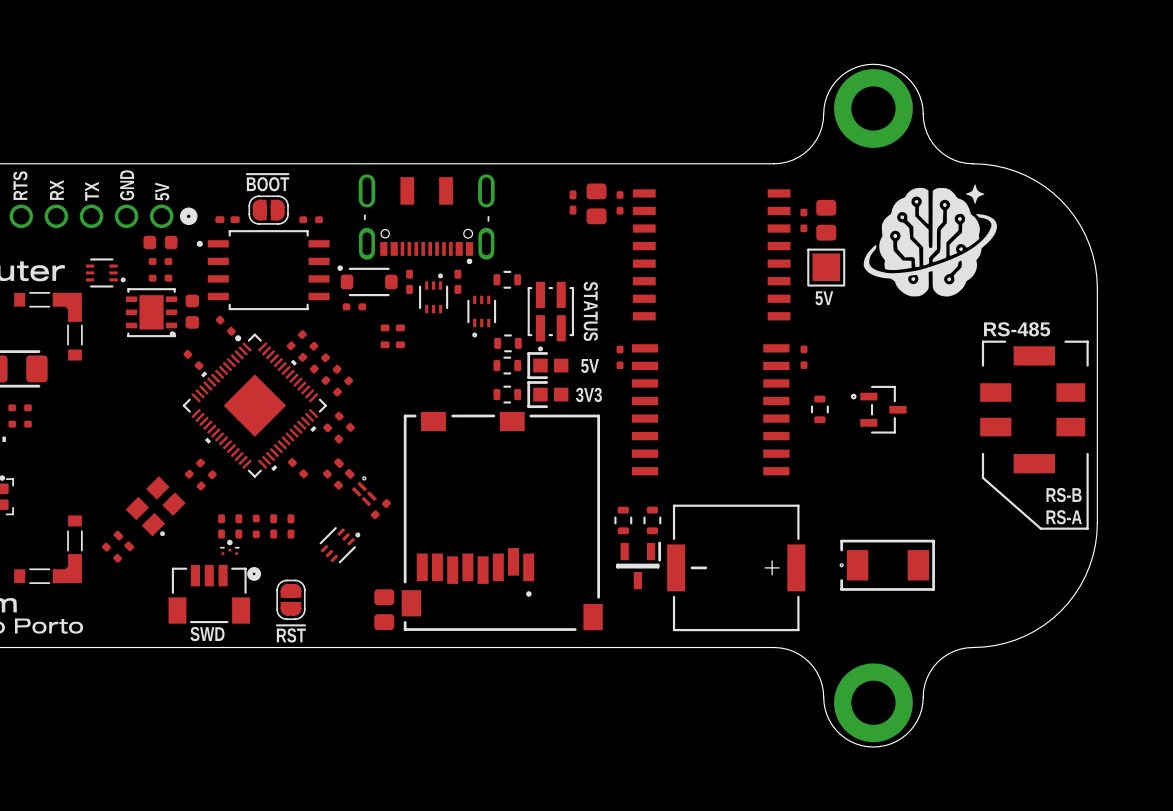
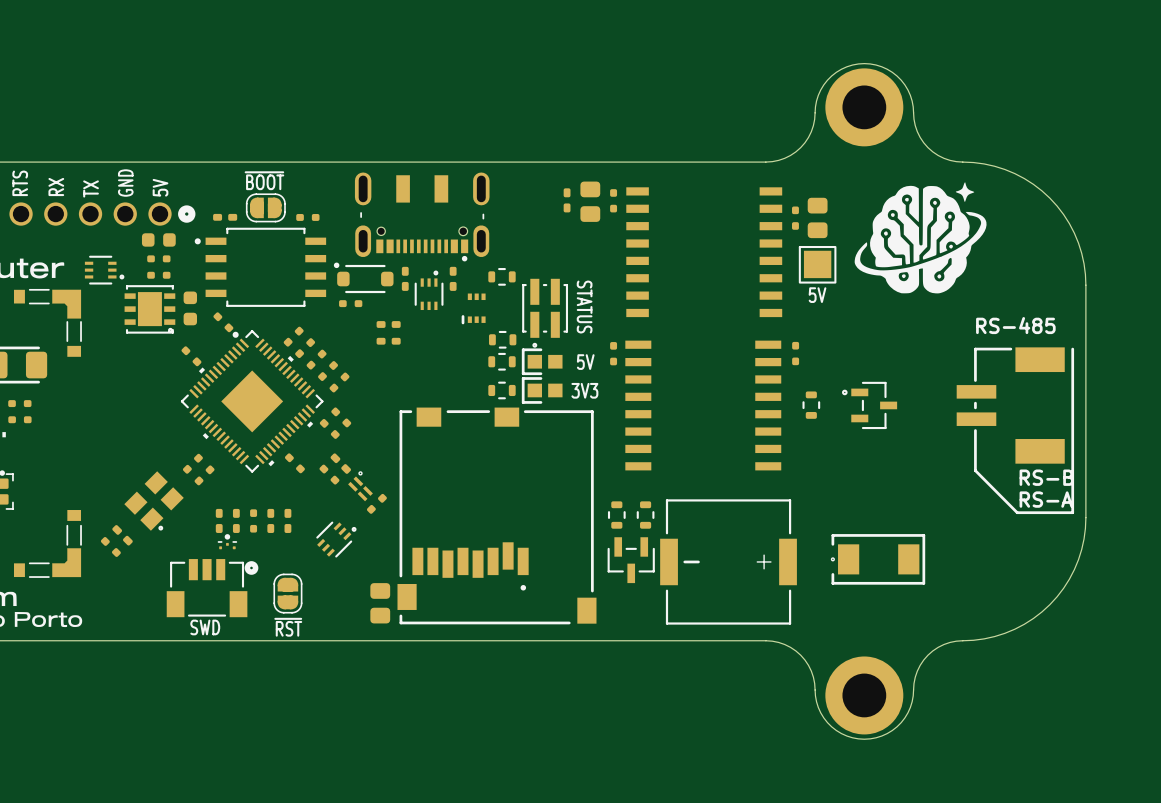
part footprint: [467, 295, 497, 338] -> [461, 293, 486, 325]
part footprint: [980, 340, 1089, 530] -> [956, 347, 1075, 515]
part footprint: [616, 541, 662, 590] -> [607, 537, 655, 584]

